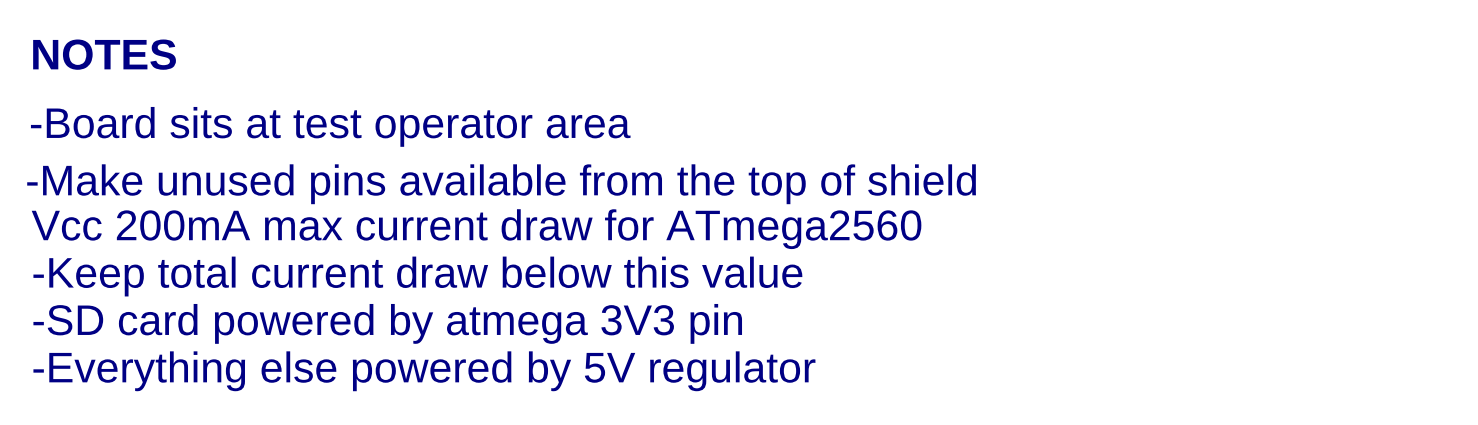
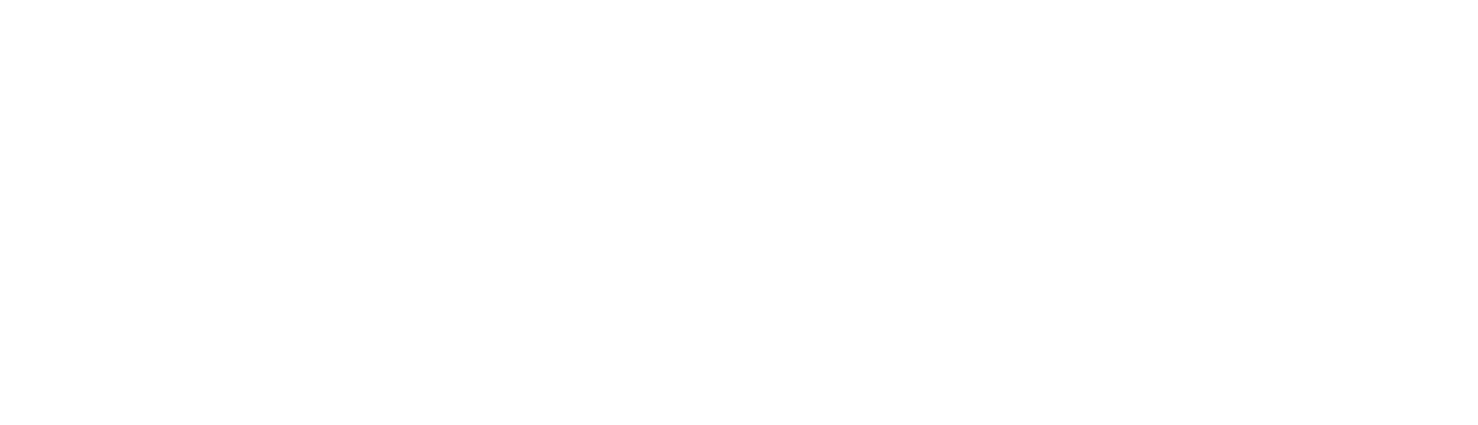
text: NOTES (104, 54) -> none
text: -Board sits at test operator area (330, 126) -> none
text: -Make unused pins available from the top of shield (501, 184) -> none
text: Vcc 200mA max current draw for ATmega2560 (476, 229) -> none
text: -Keep total current draw below this value (417, 276) -> none
text: -SD card powered by atmega 3V3 pin (387, 323) -> none
text: -Everything else powered by 5V regulator (424, 371) -> none

